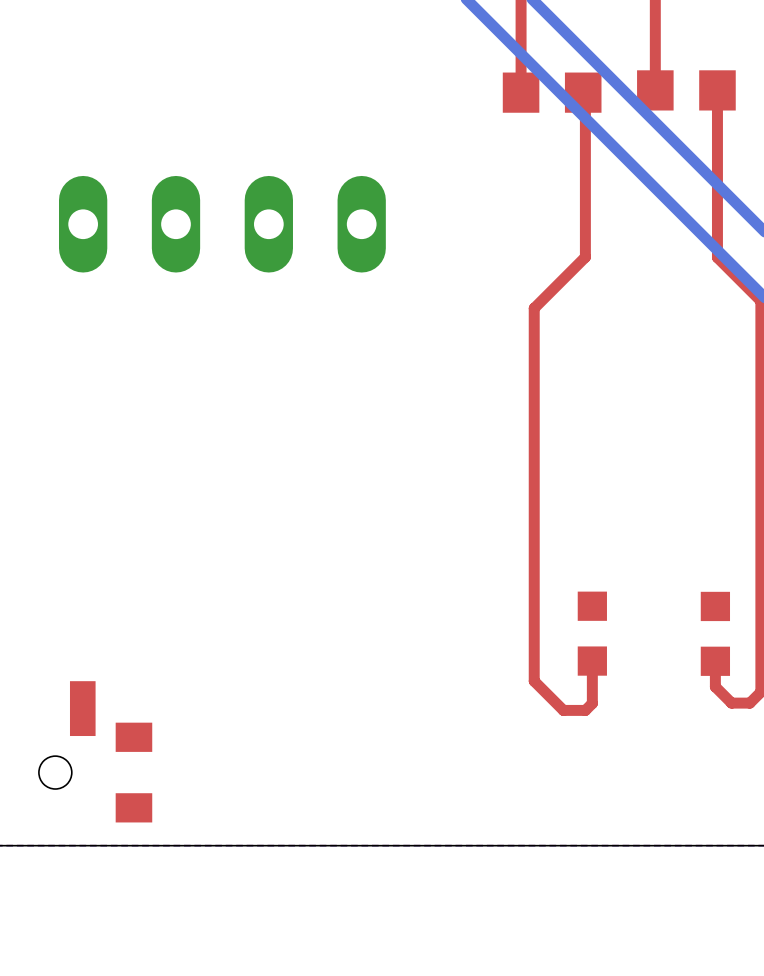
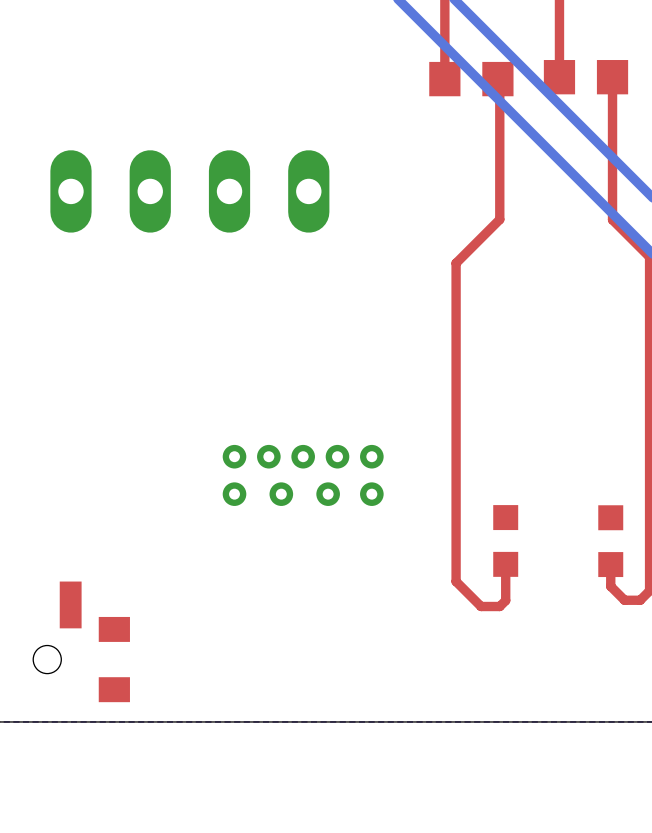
via: none -> (234, 456)
via: none -> (268, 456)
via: none -> (303, 456)
via: none -> (337, 456)
via: none -> (371, 456)
via: none -> (234, 494)
via: none -> (281, 494)
via: none -> (328, 494)
via: none -> (371, 494)

